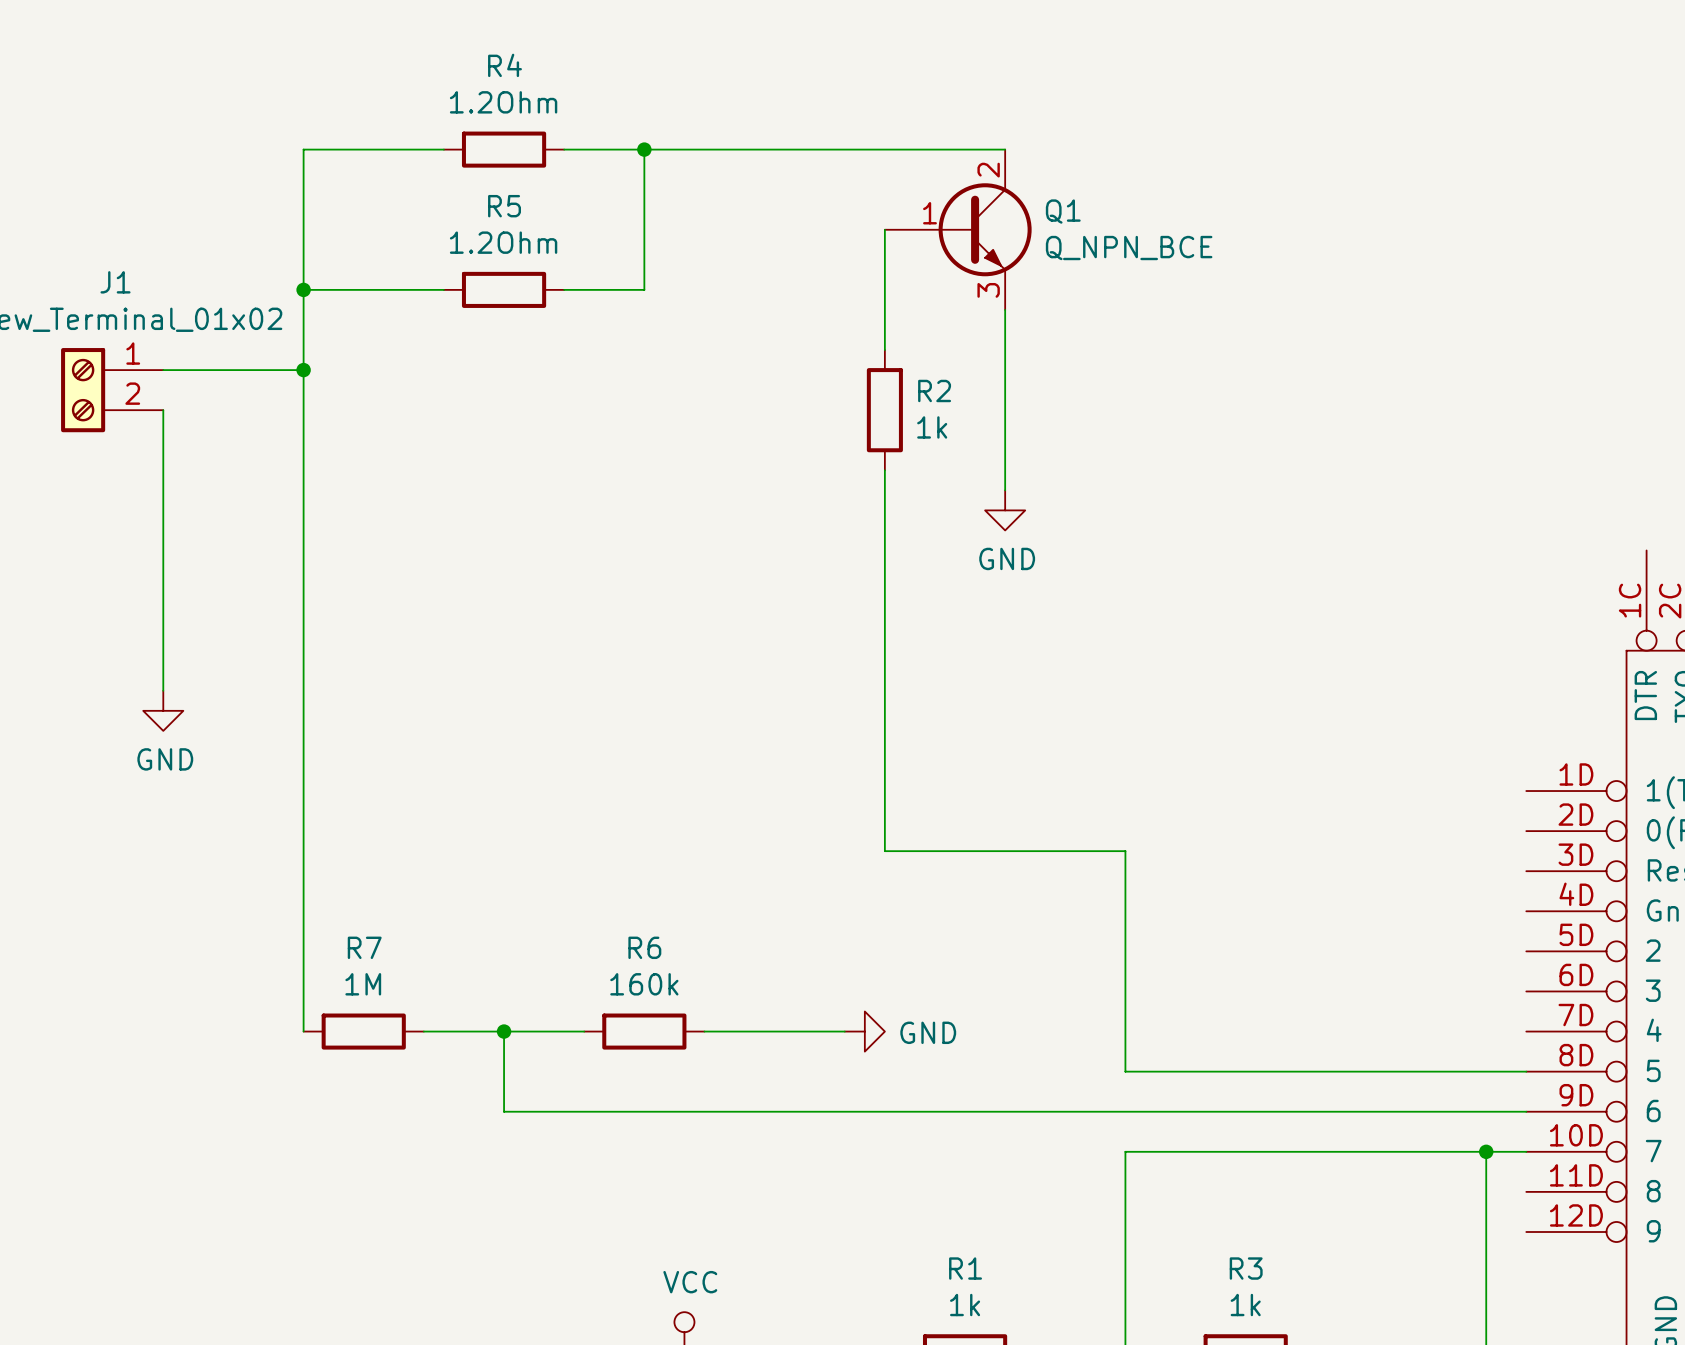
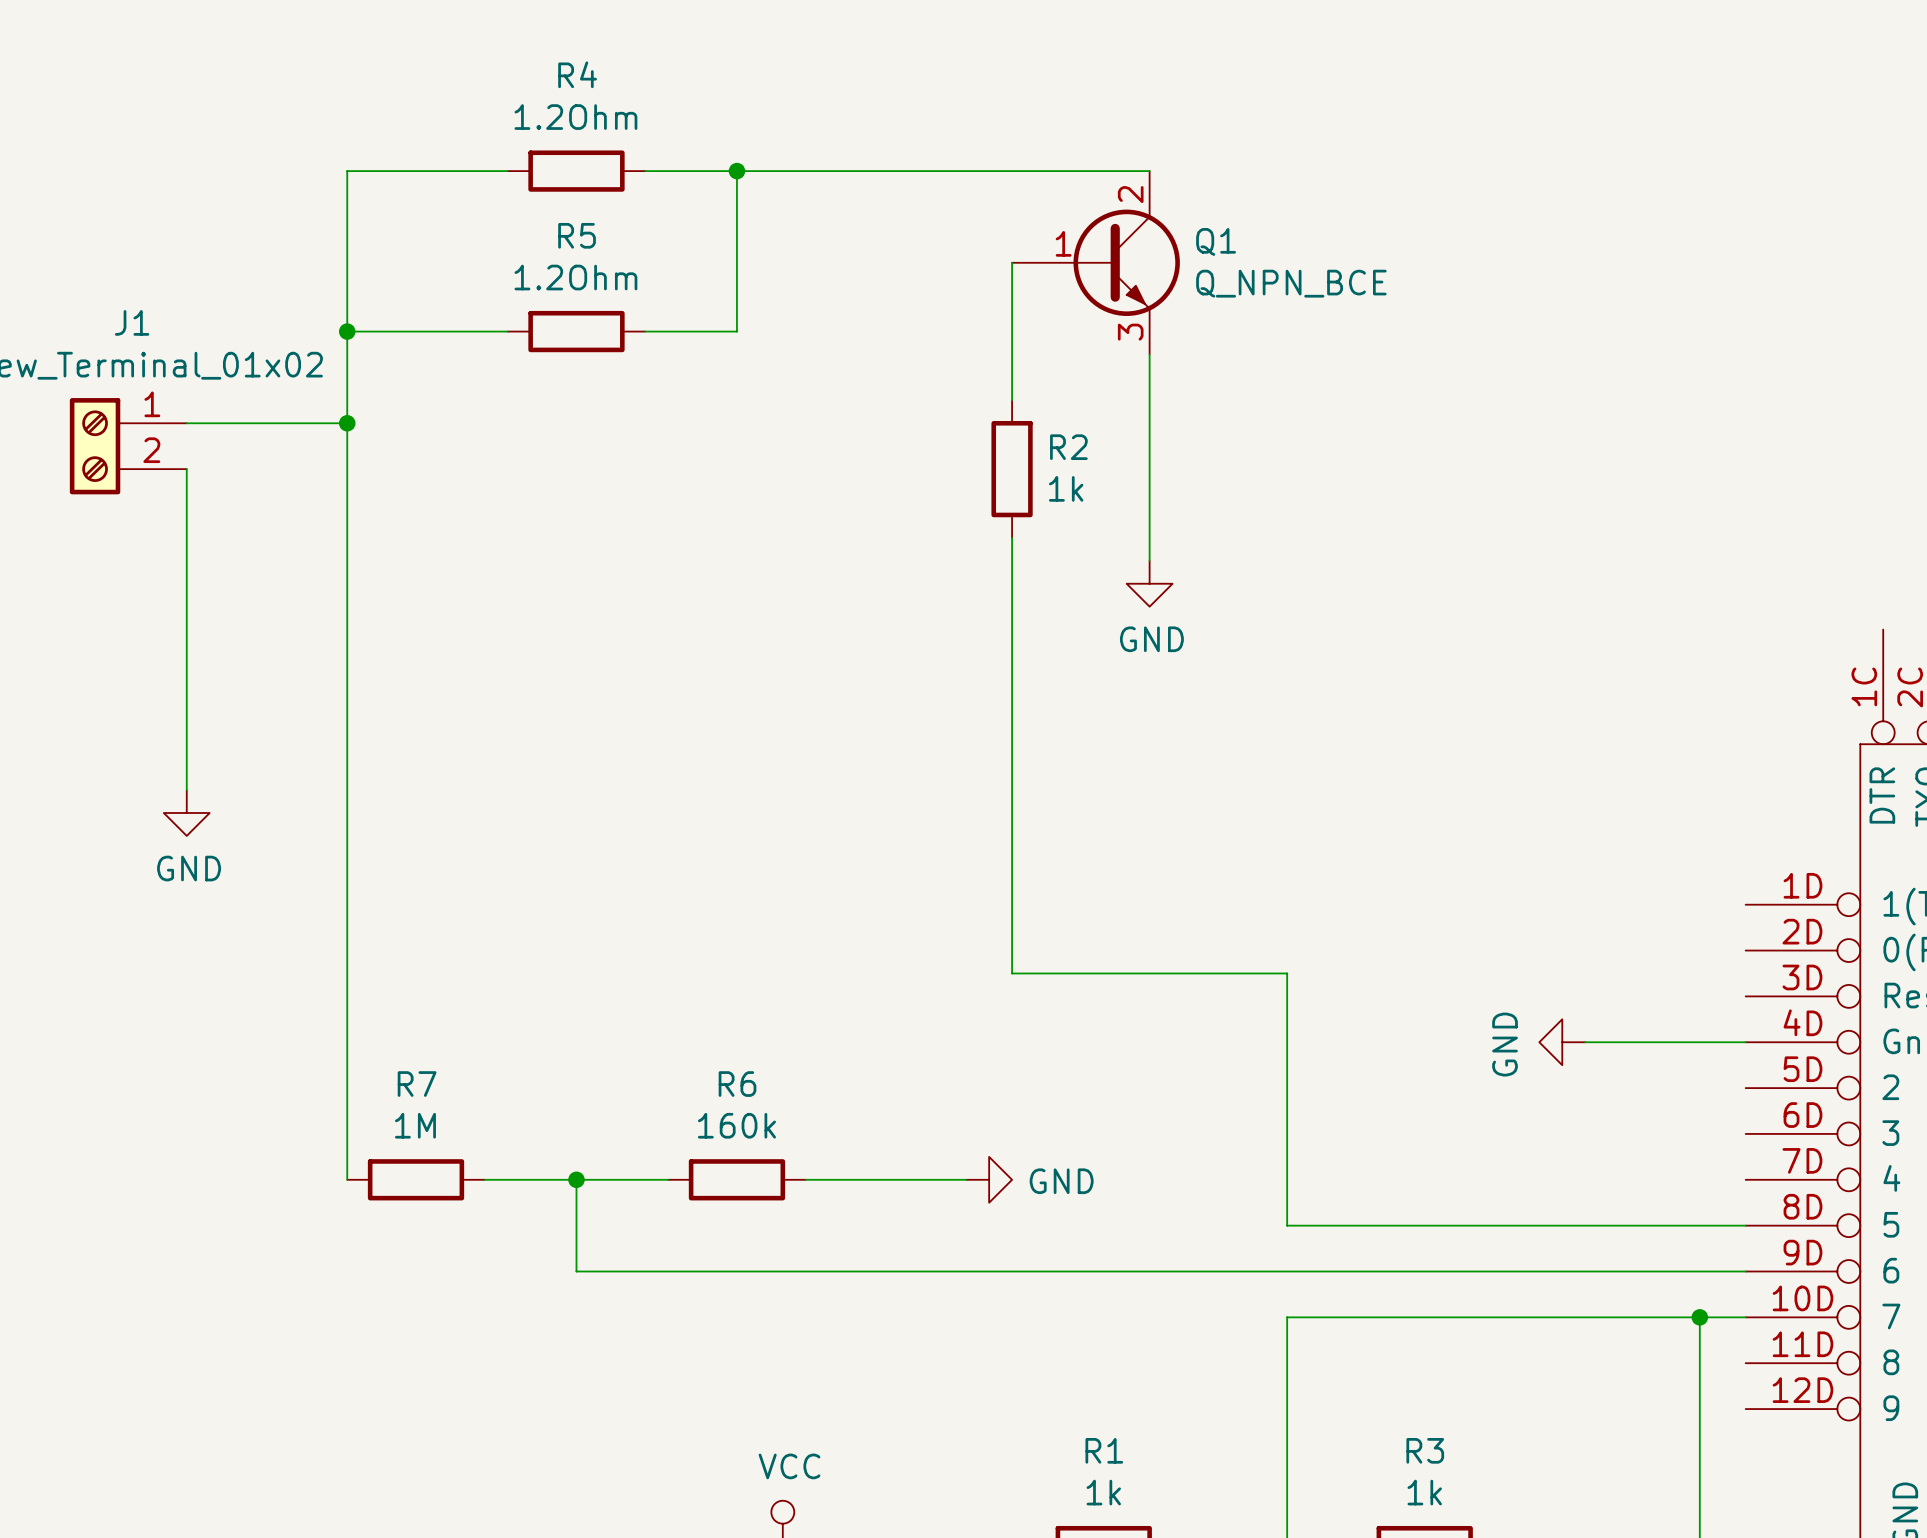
power symbol: none -> GND (1562, 1042)
wire: none -> (1585, 1042) (1745, 1042)

